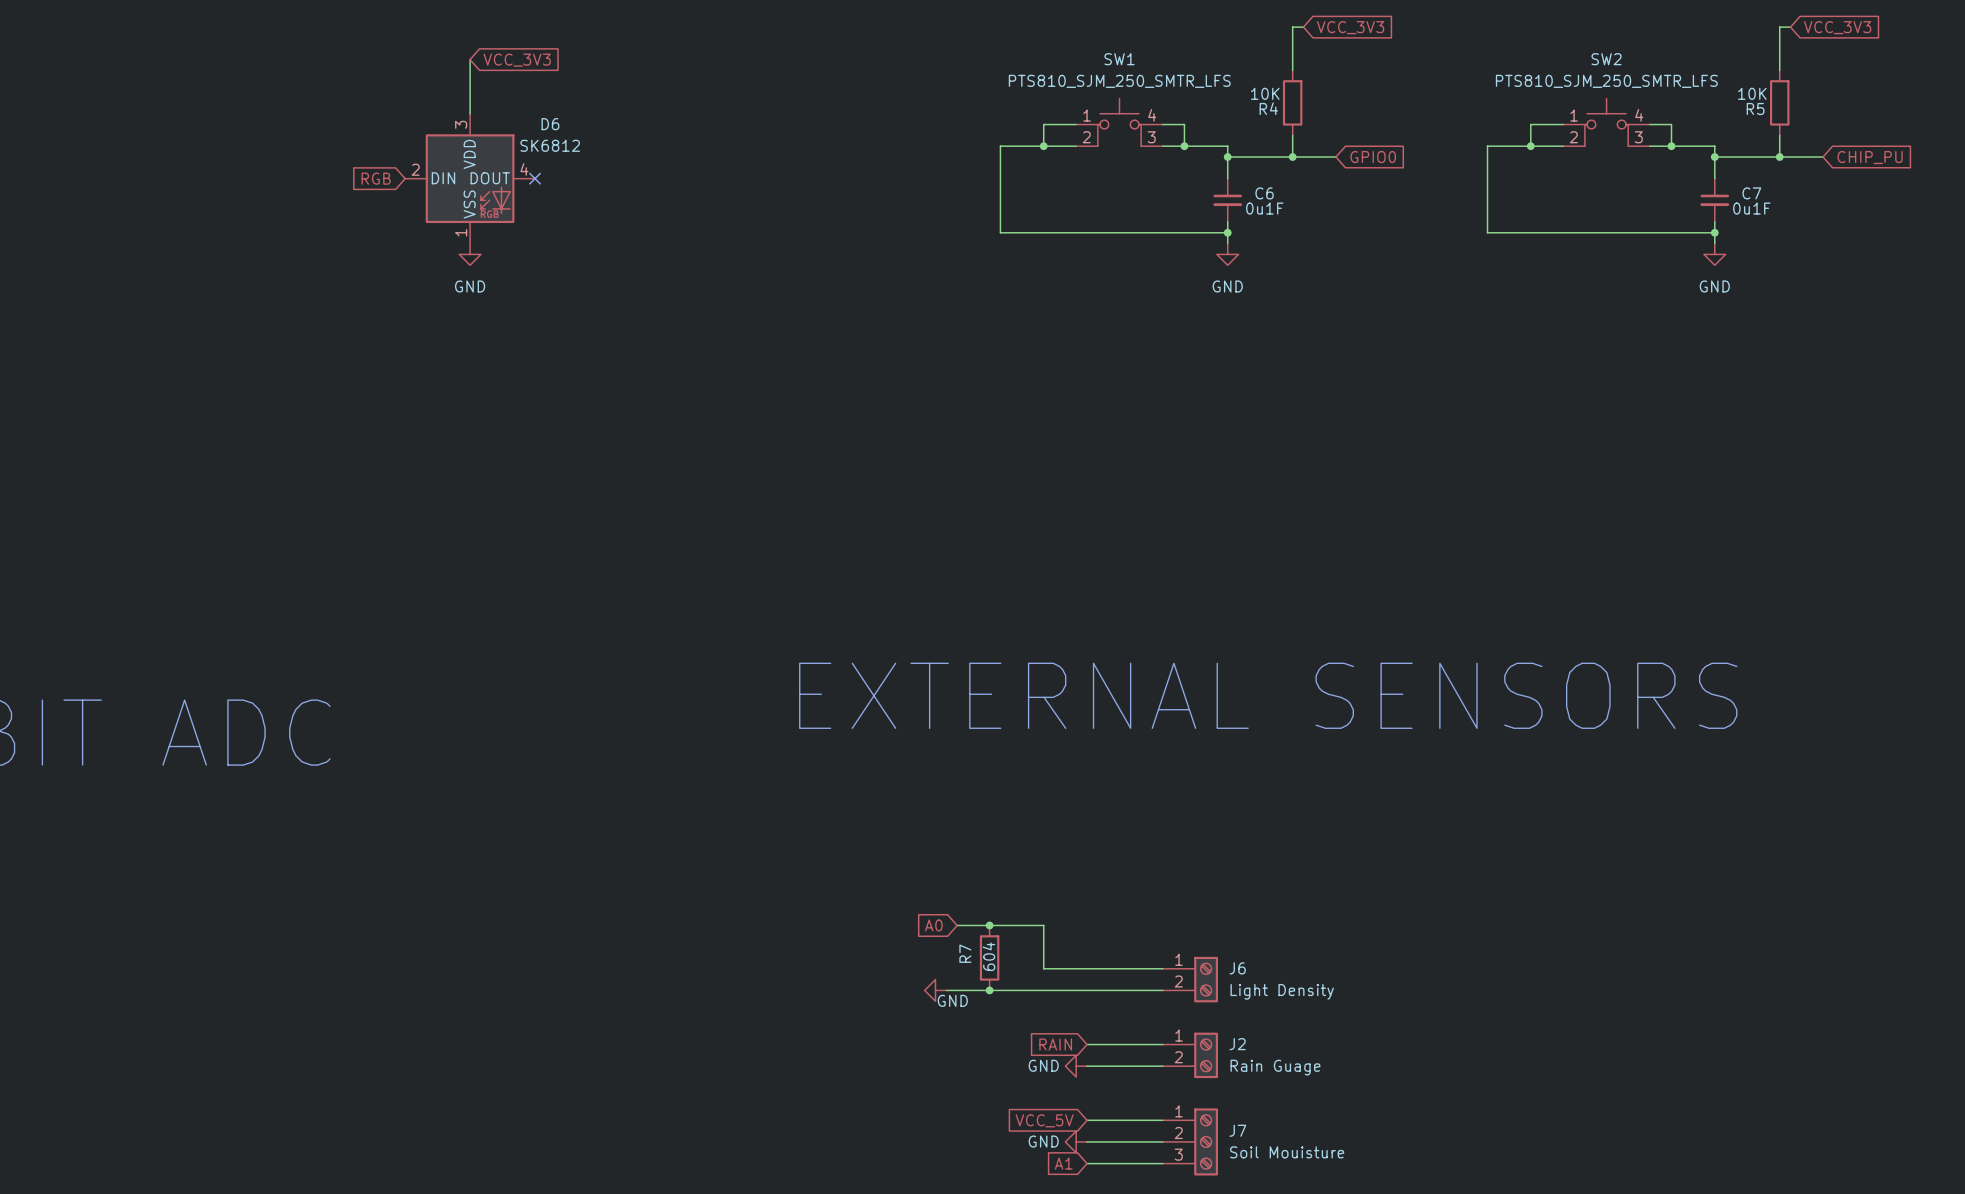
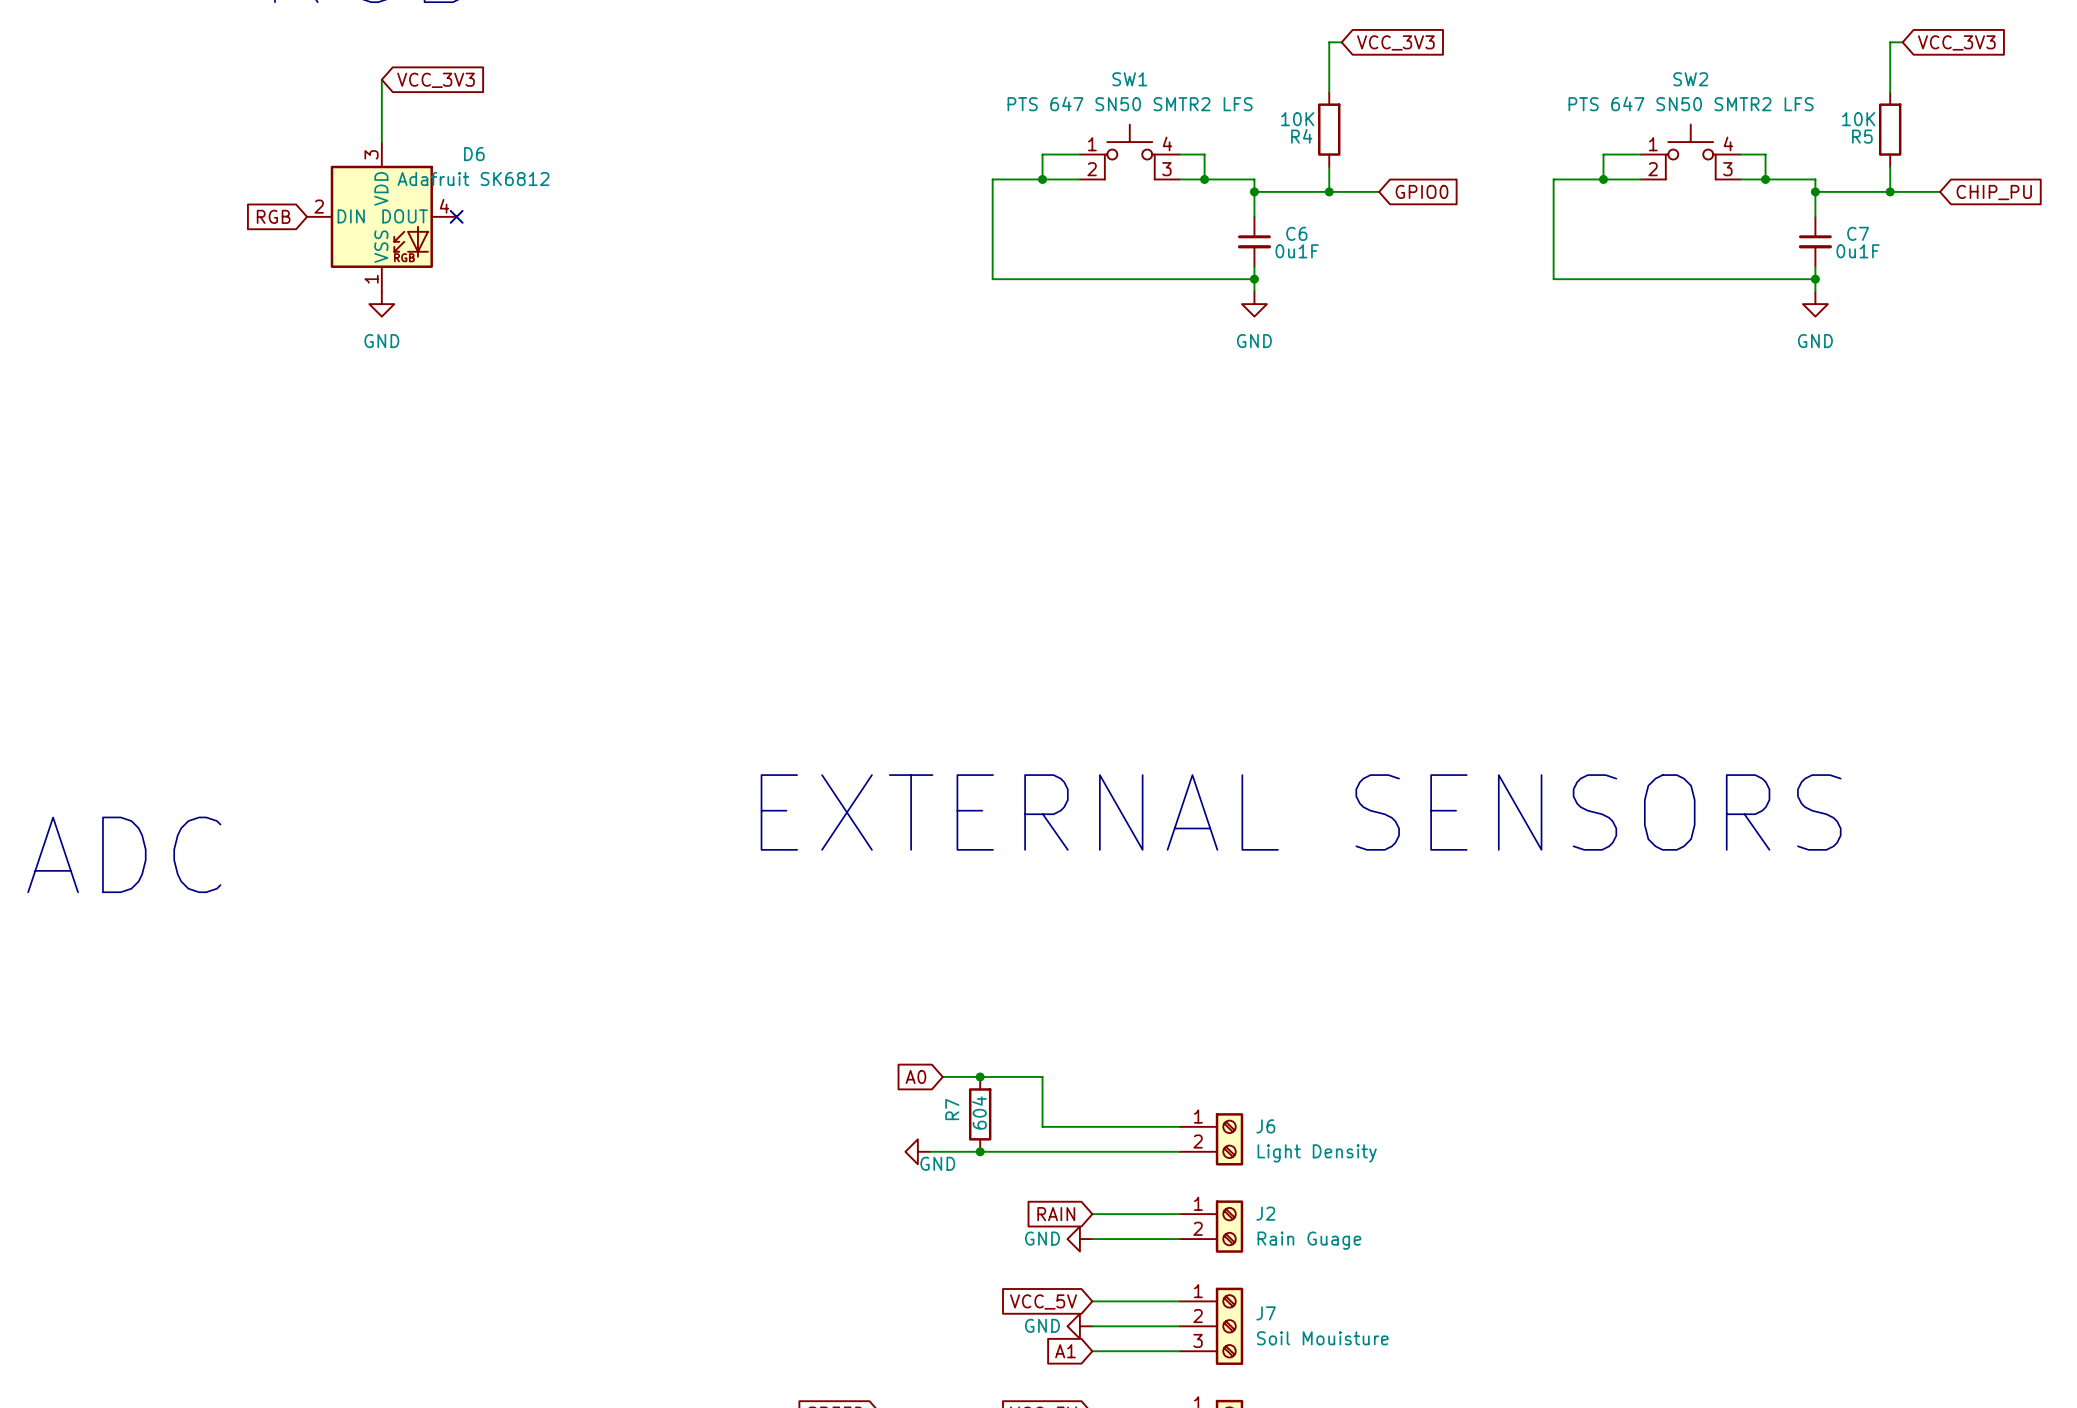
SW1 value: PTS810_SJM_250_SMTR_LFS (1119, 81) -> PTS 647 SN50 SMTR2 LFS (1130, 103)
SW2 value: PTS810_SJM_250_SMTR_LFS (1606, 81) -> PTS 647 SN50 SMTR2 LFS (1691, 103)
D6 value: SK6812 (550, 145) -> Adafruit SK6812 (473, 179)

